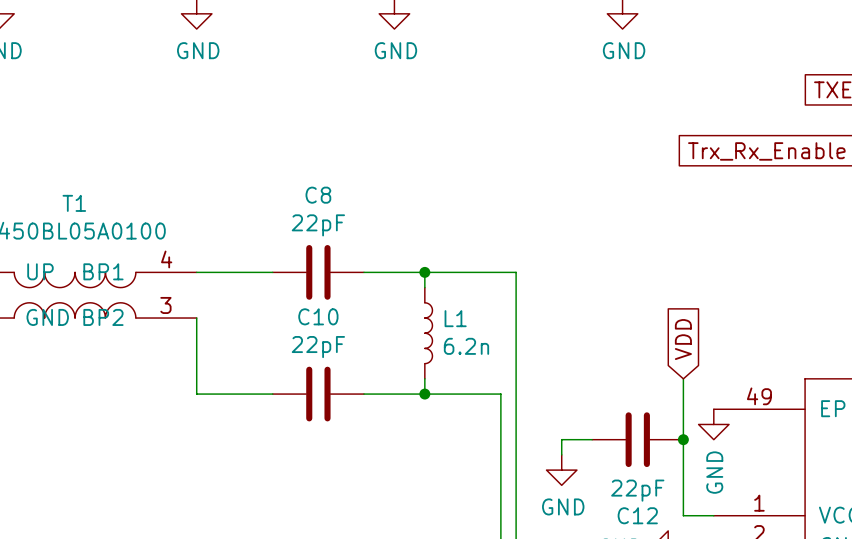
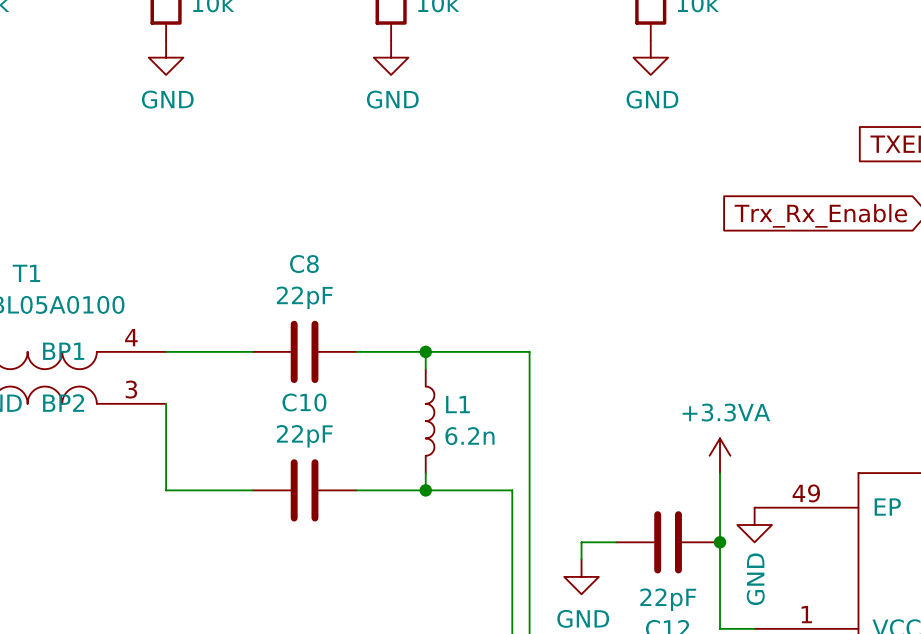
global label: VDD (683, 339) -> none
power symbol: none -> +3.3VA (720, 455)

